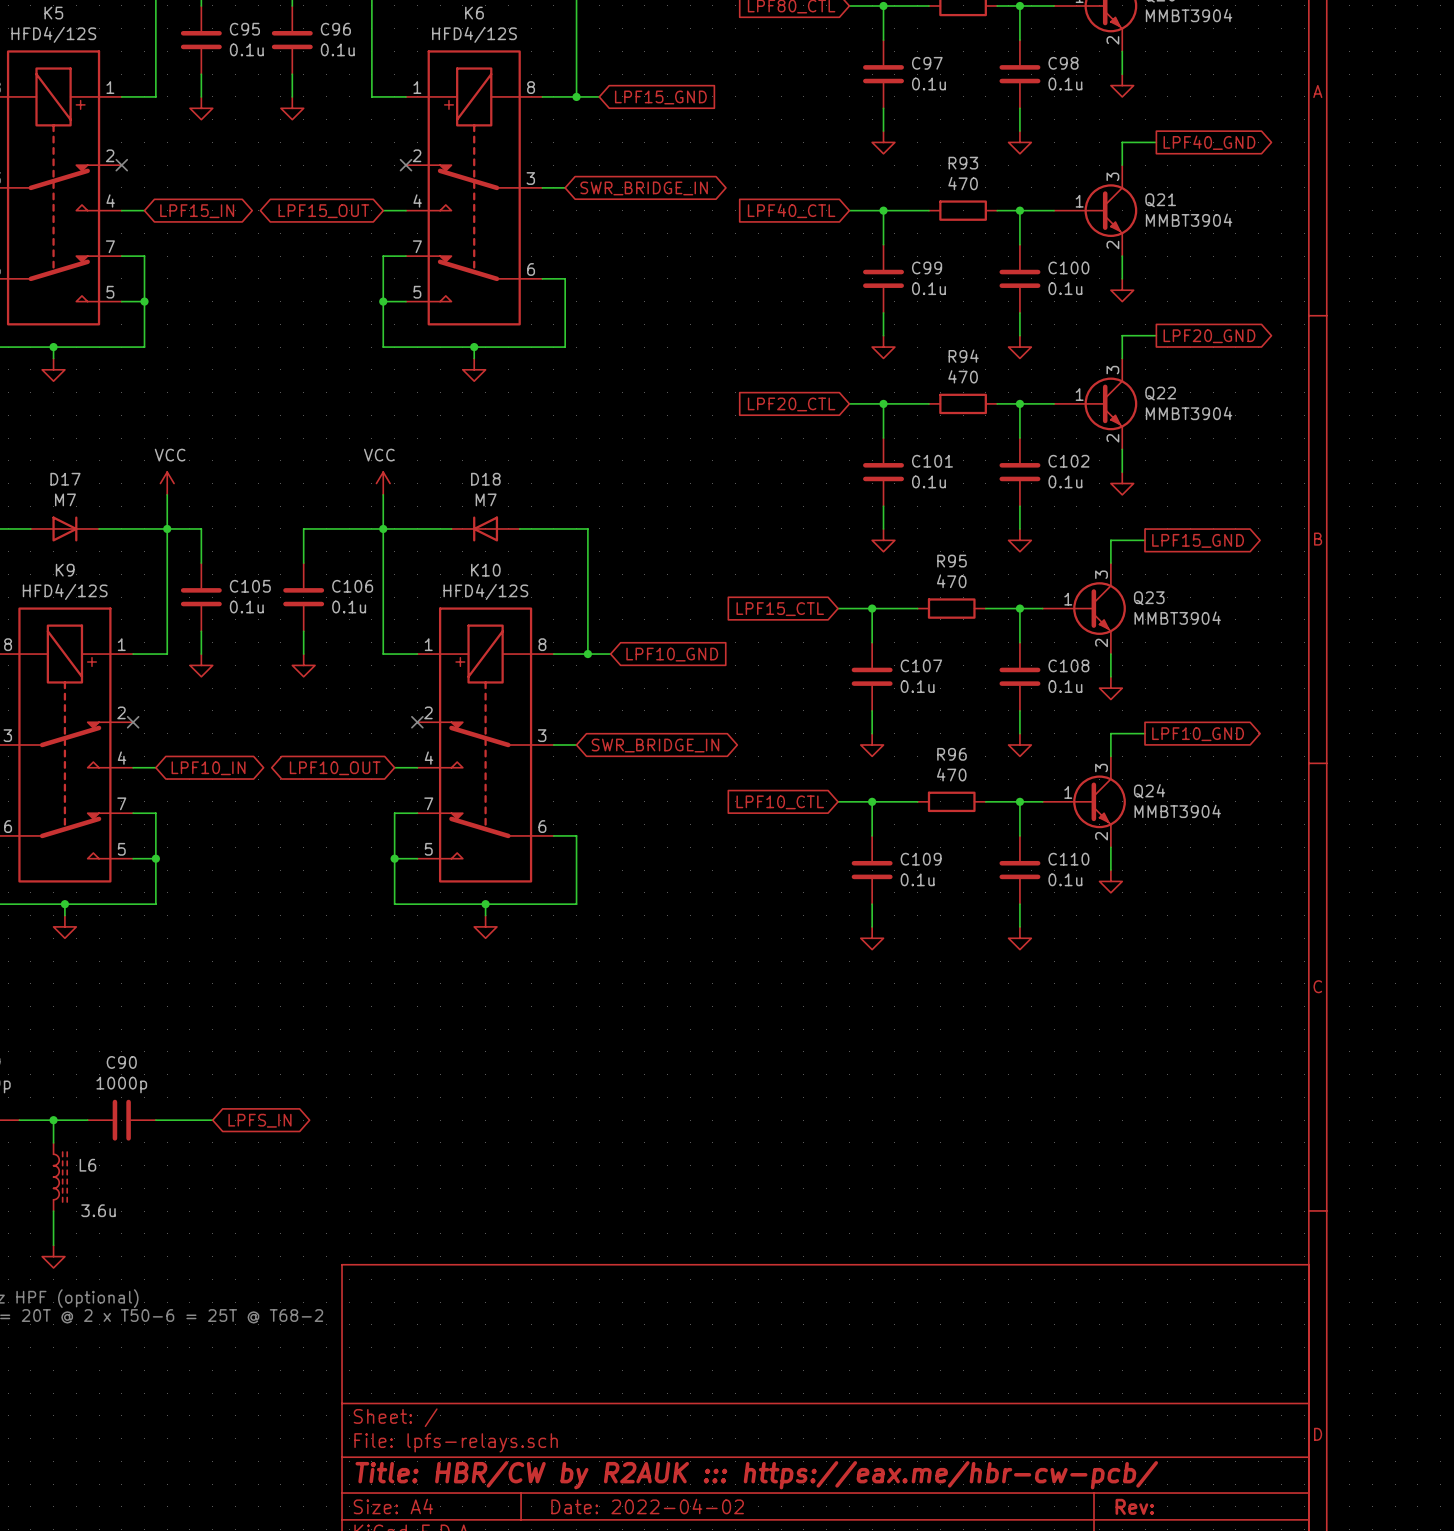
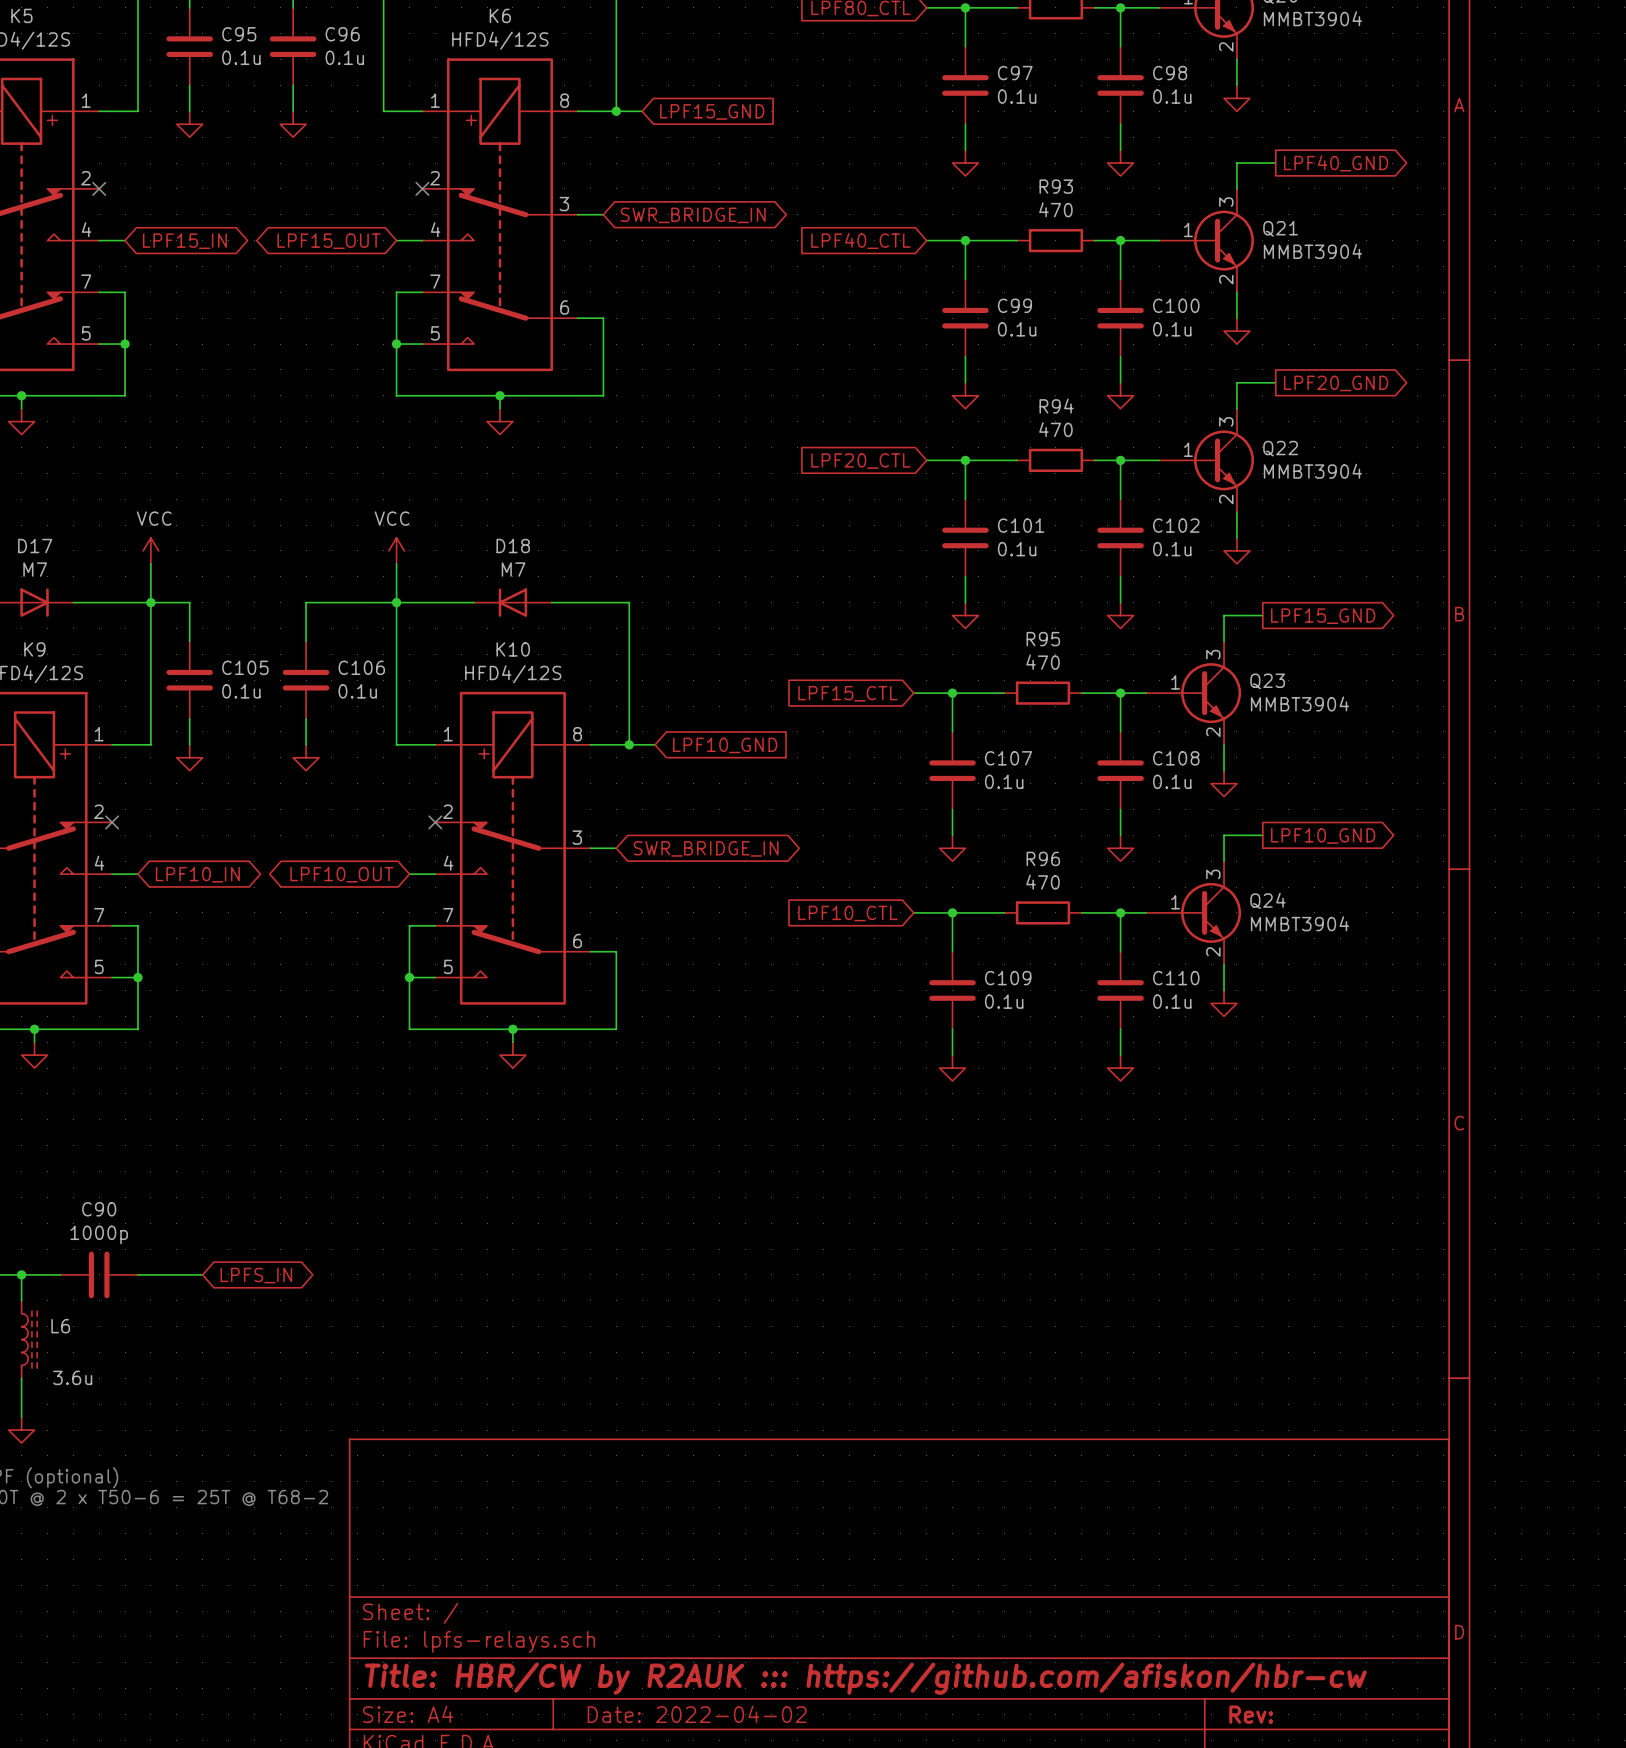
title block: Title: HBR/CW by R2AUK ::: https://eax.me/hbr-cw-pcb/ (756, 1475) -> Title: HBR/CW by R2AUK ::: https://github.com/afiskon/hbr-cw (865, 1678)

